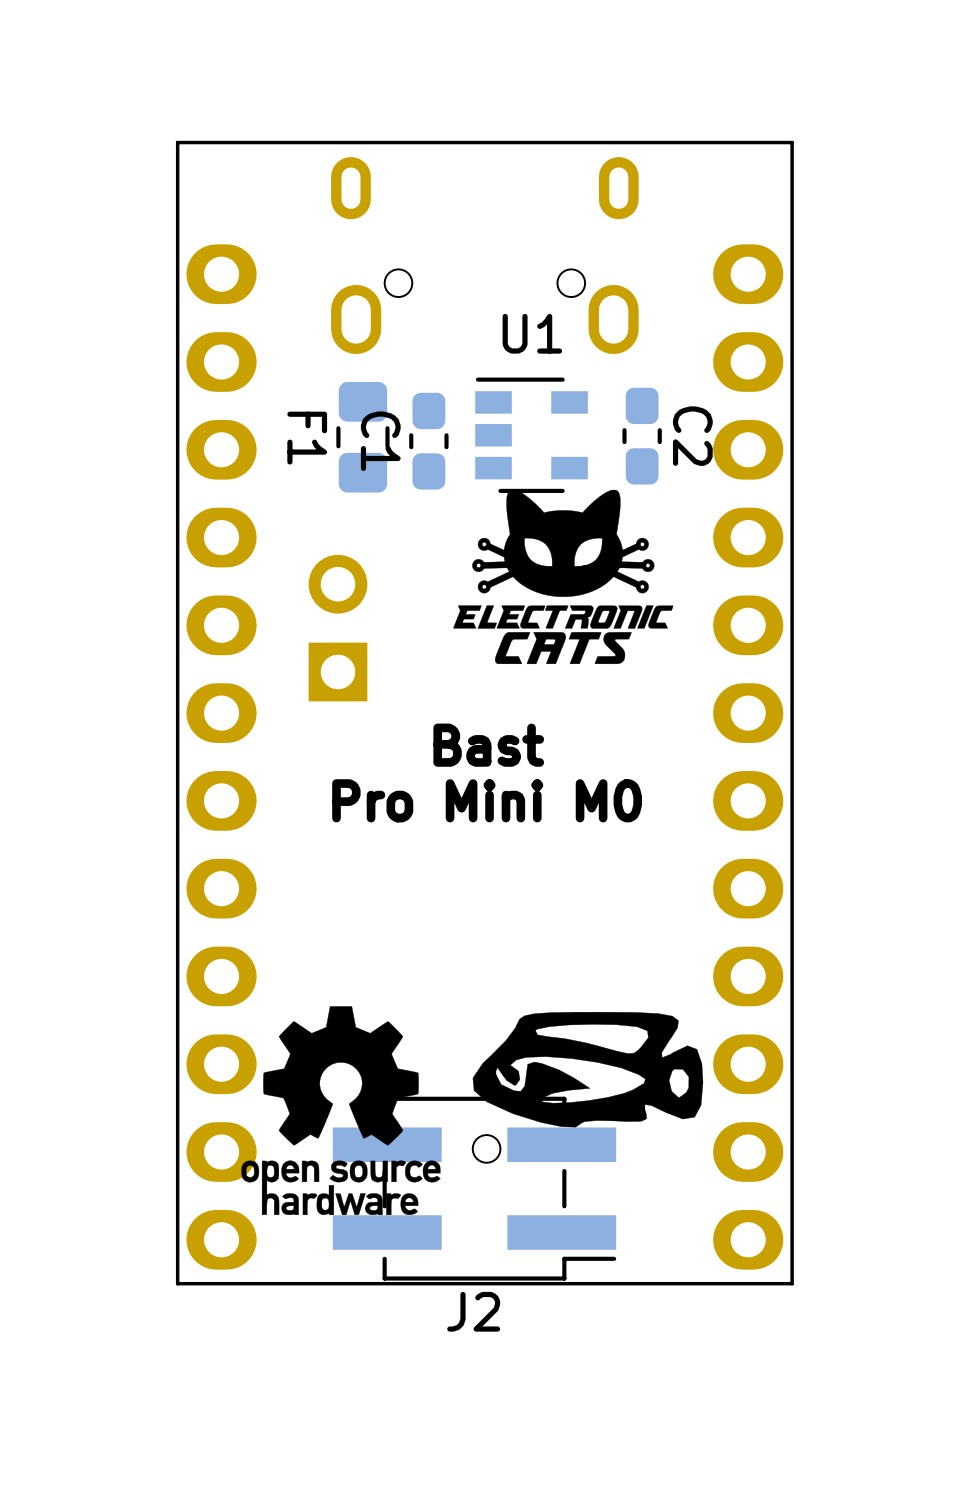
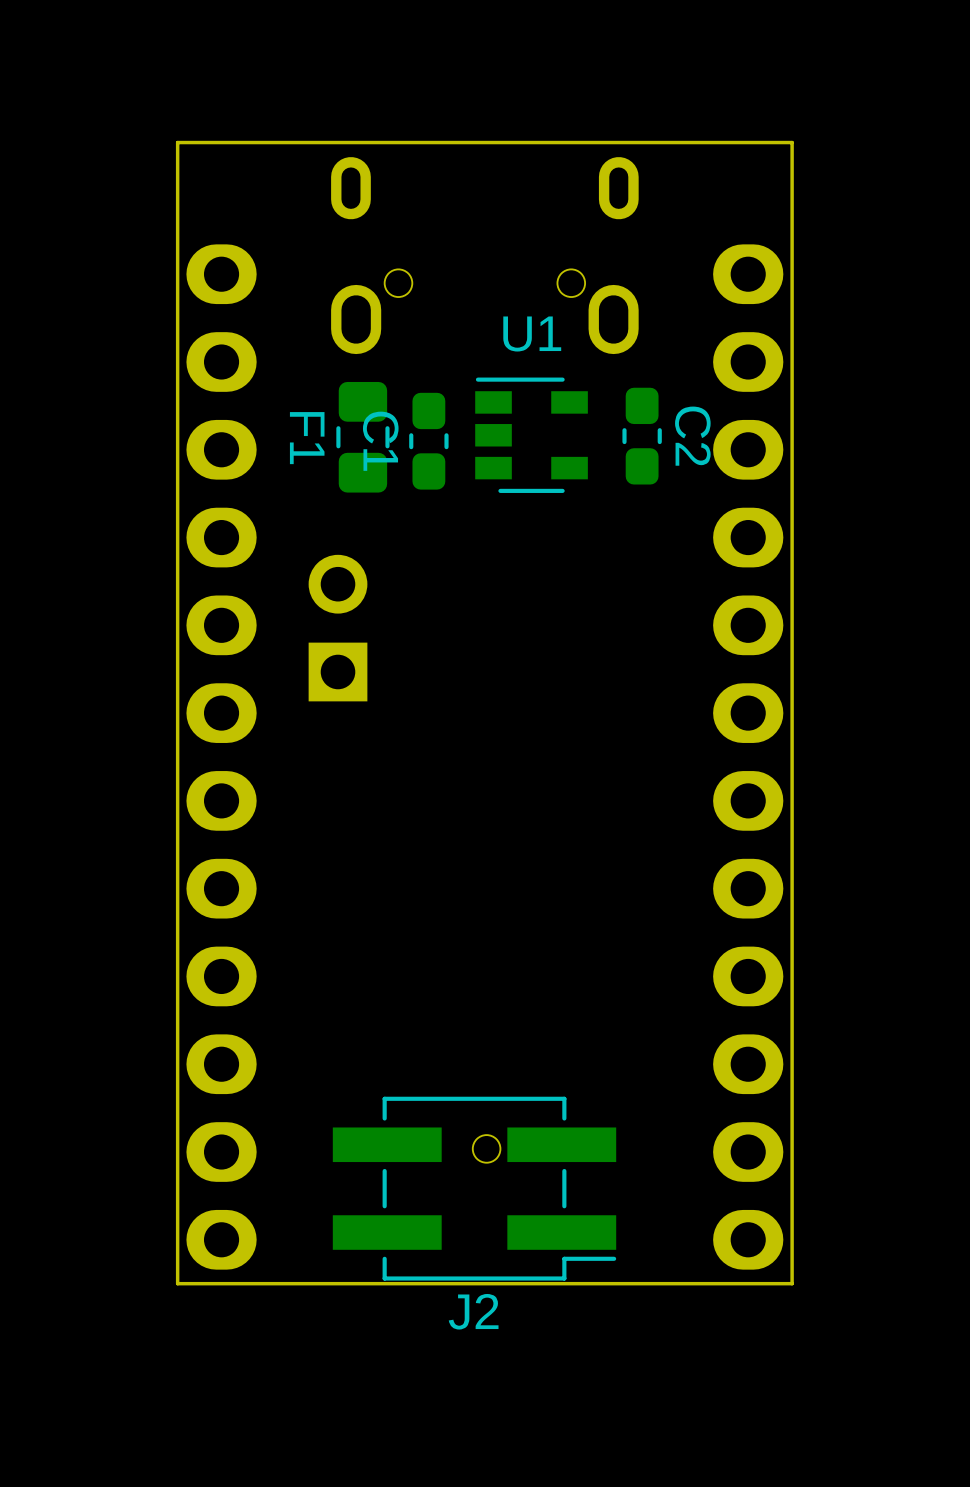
drawing: [453, 489, 674, 665] -> none
text: Bast (488, 745) -> none
text: Pro Mini M0 (487, 800) -> none
drawing: [241, 1006, 704, 1216] -> none

